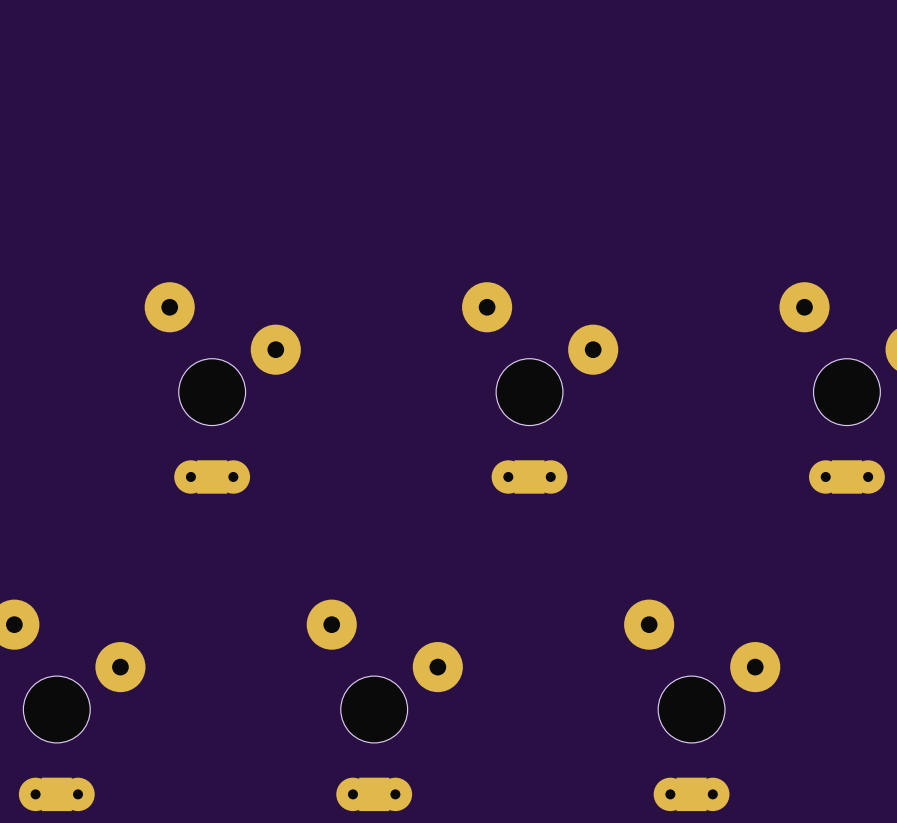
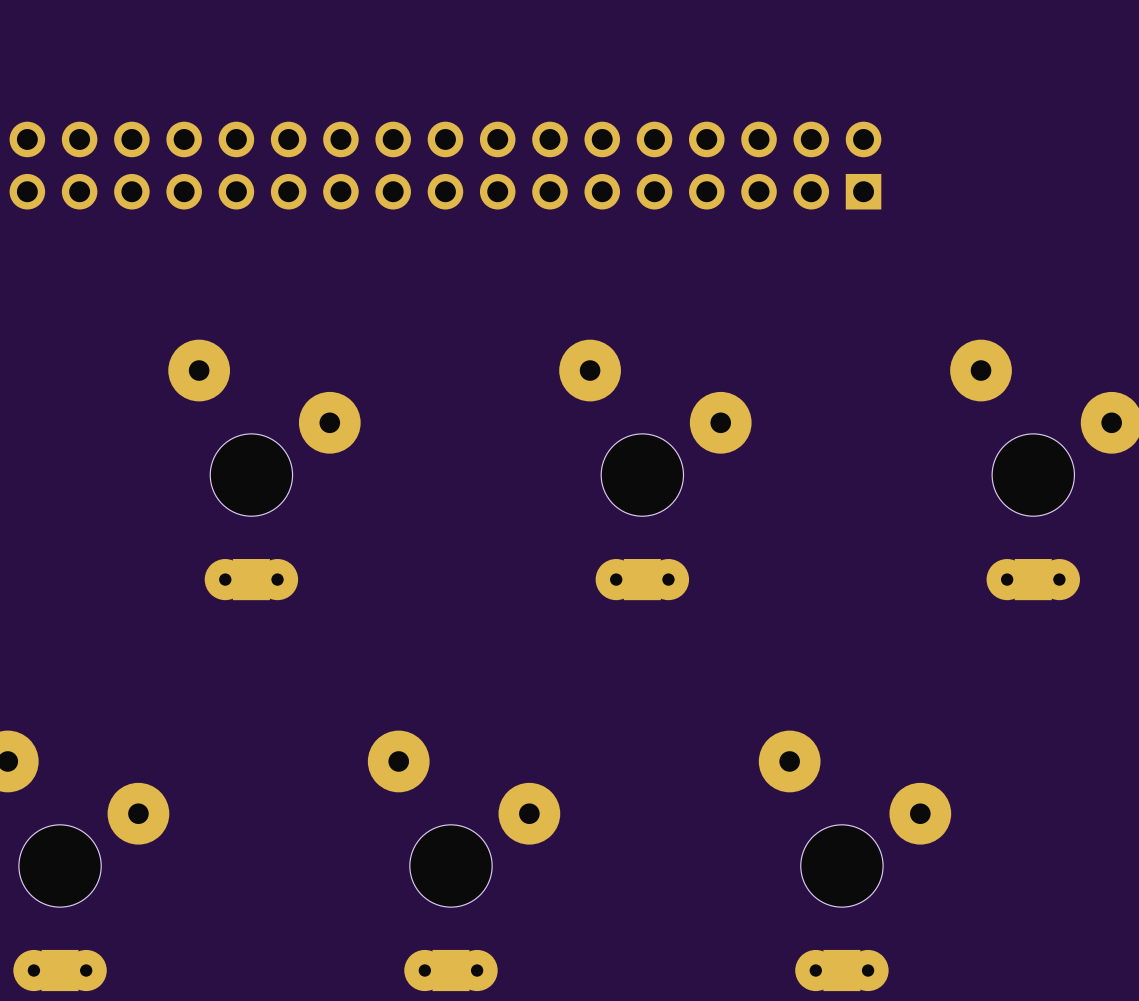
part: none -> (445, 165)

